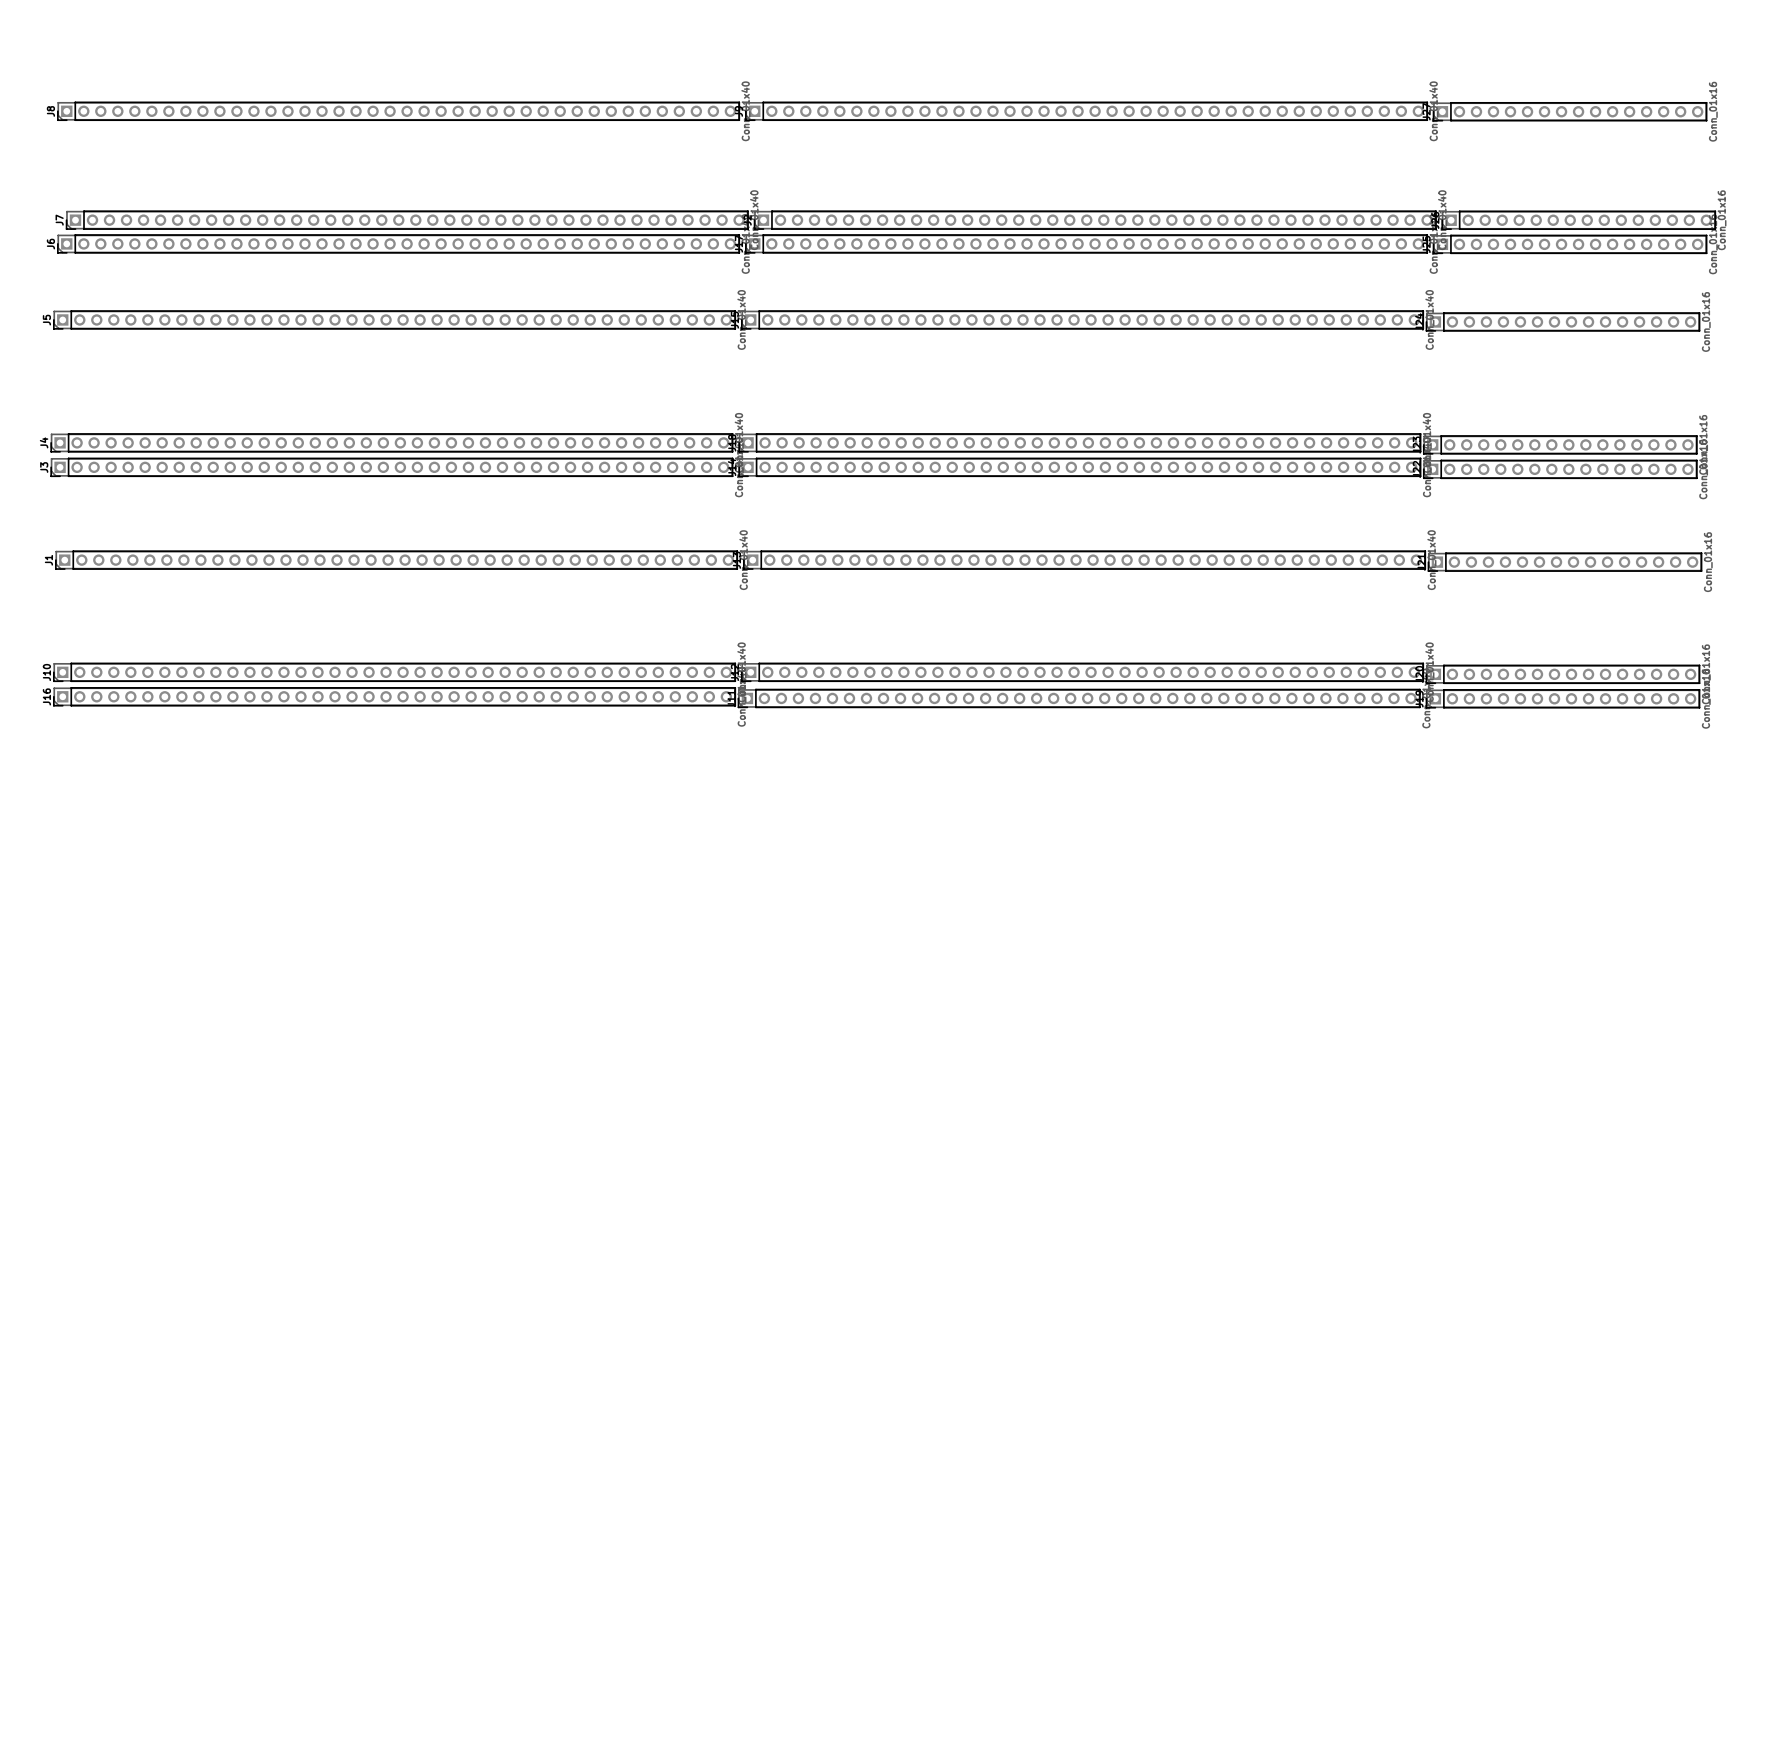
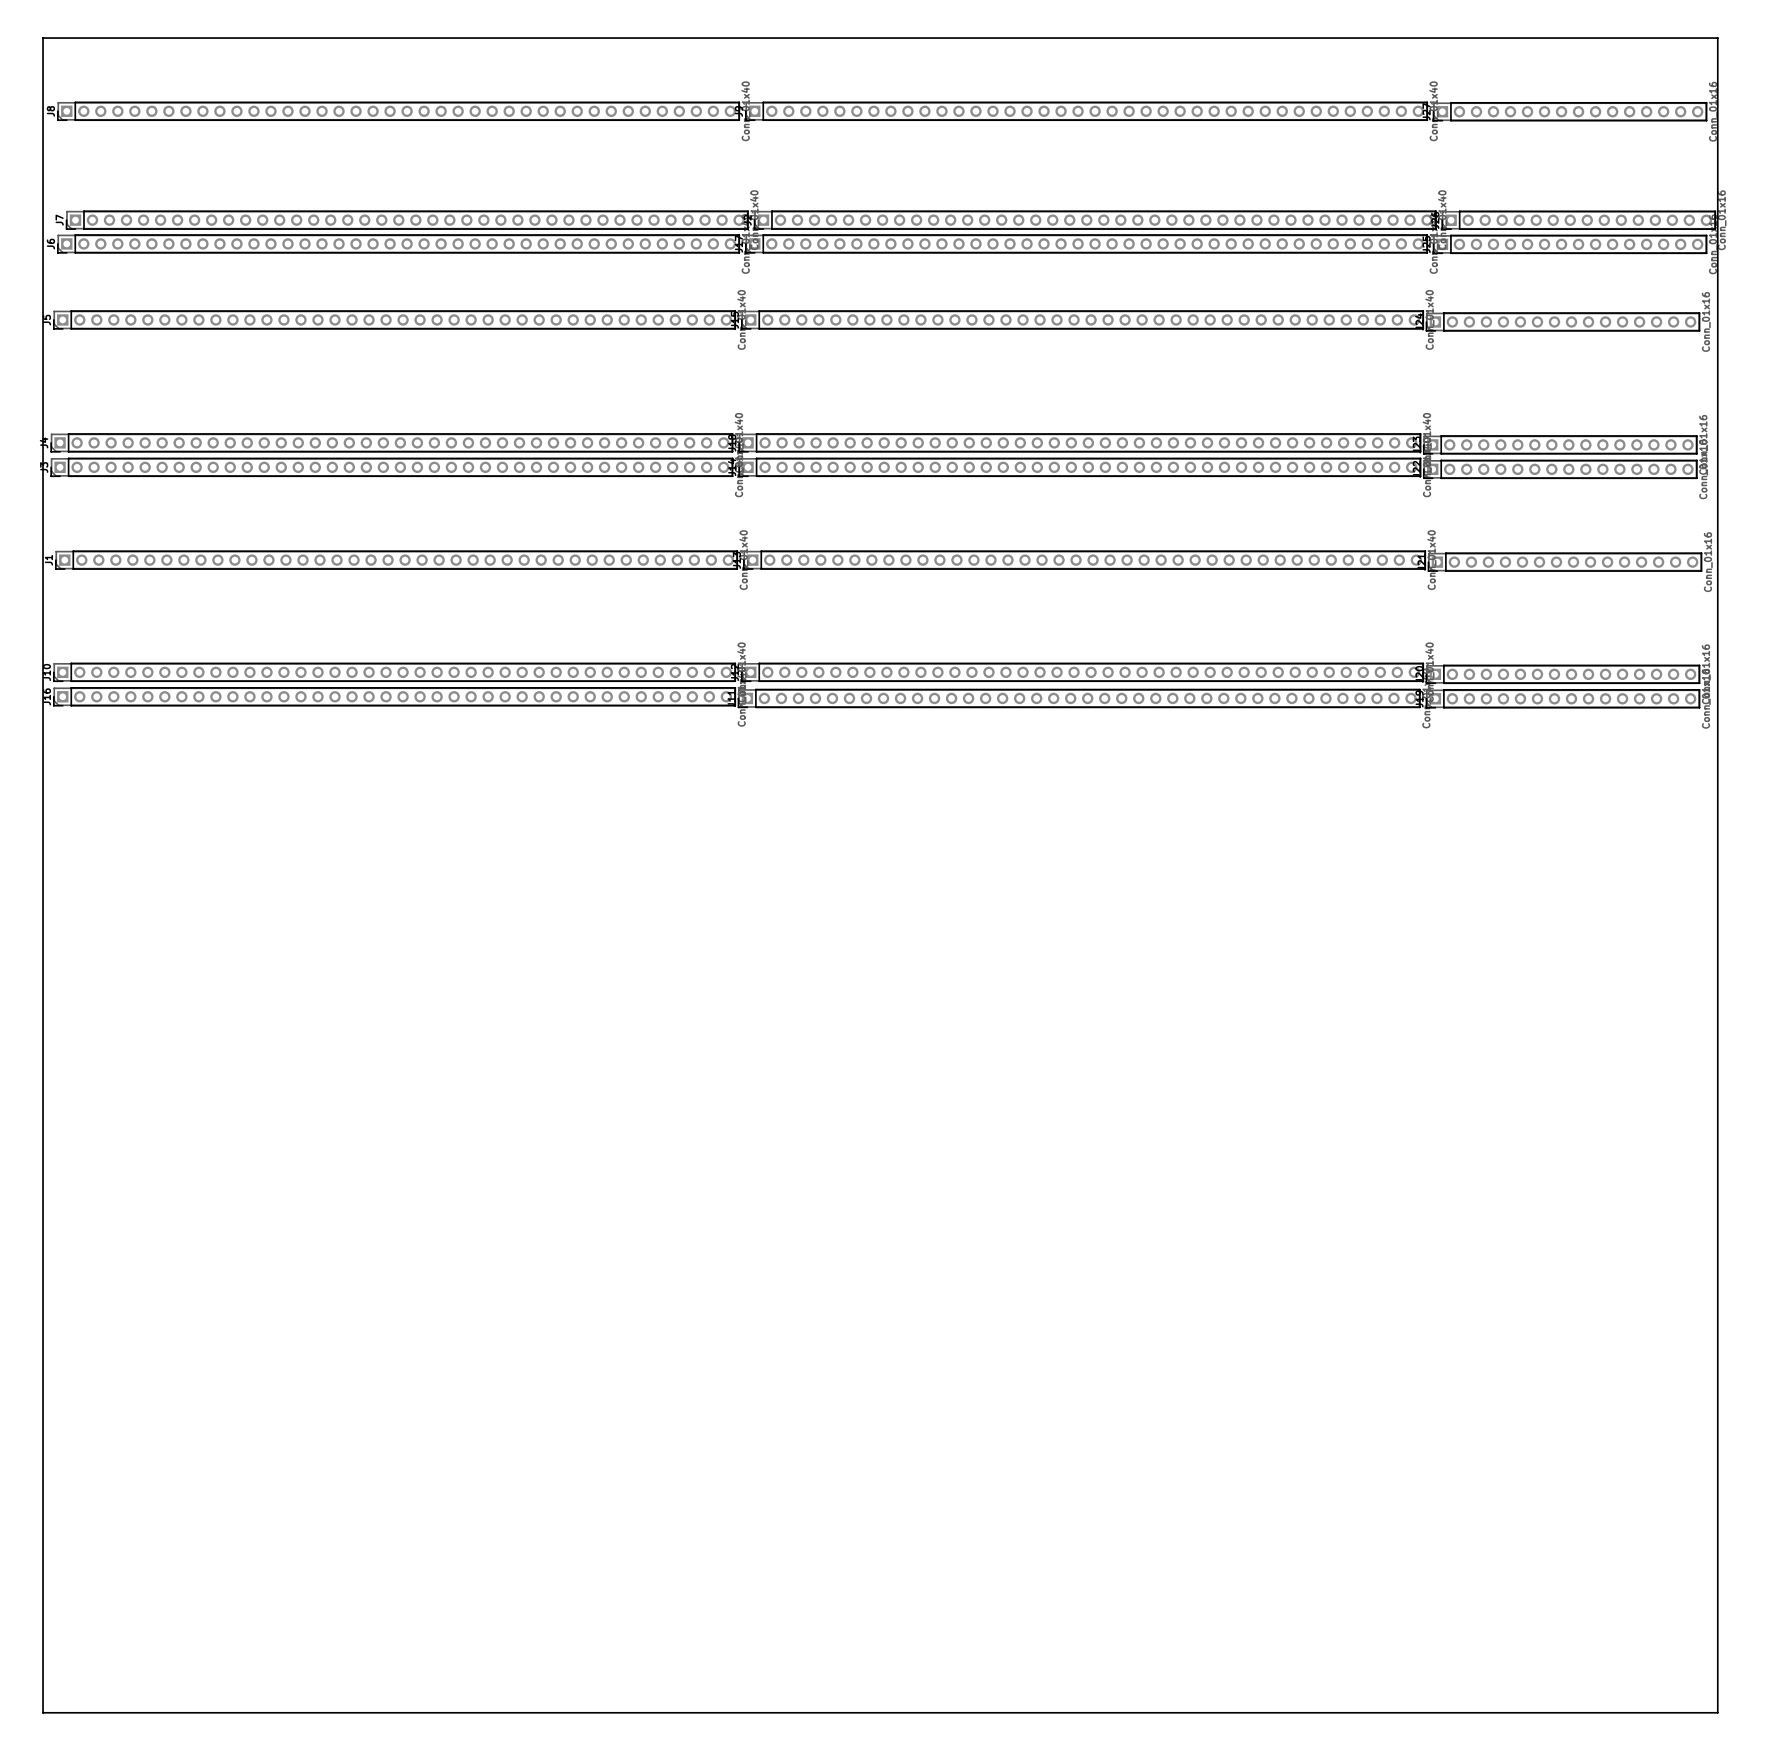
board edge: none -> (43, 38) (43, 1712) (1717, 1712) (1717, 38) (43, 38)

